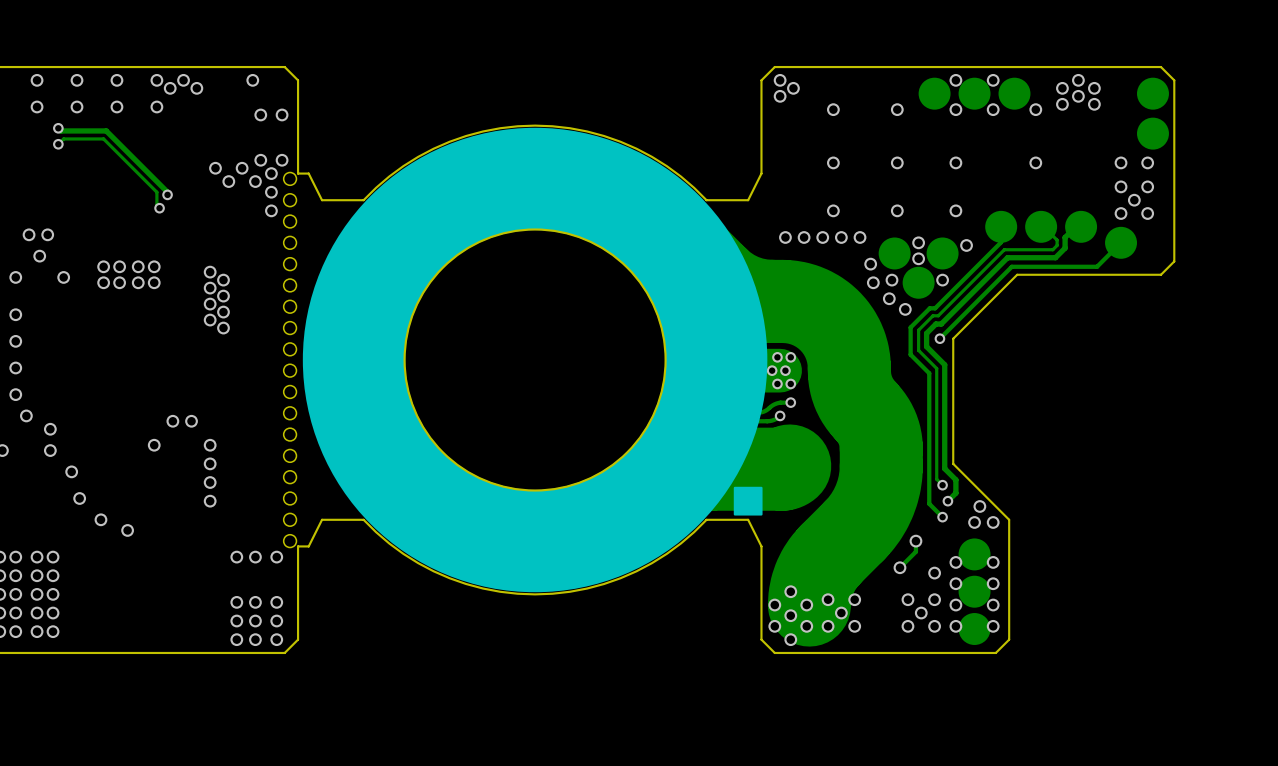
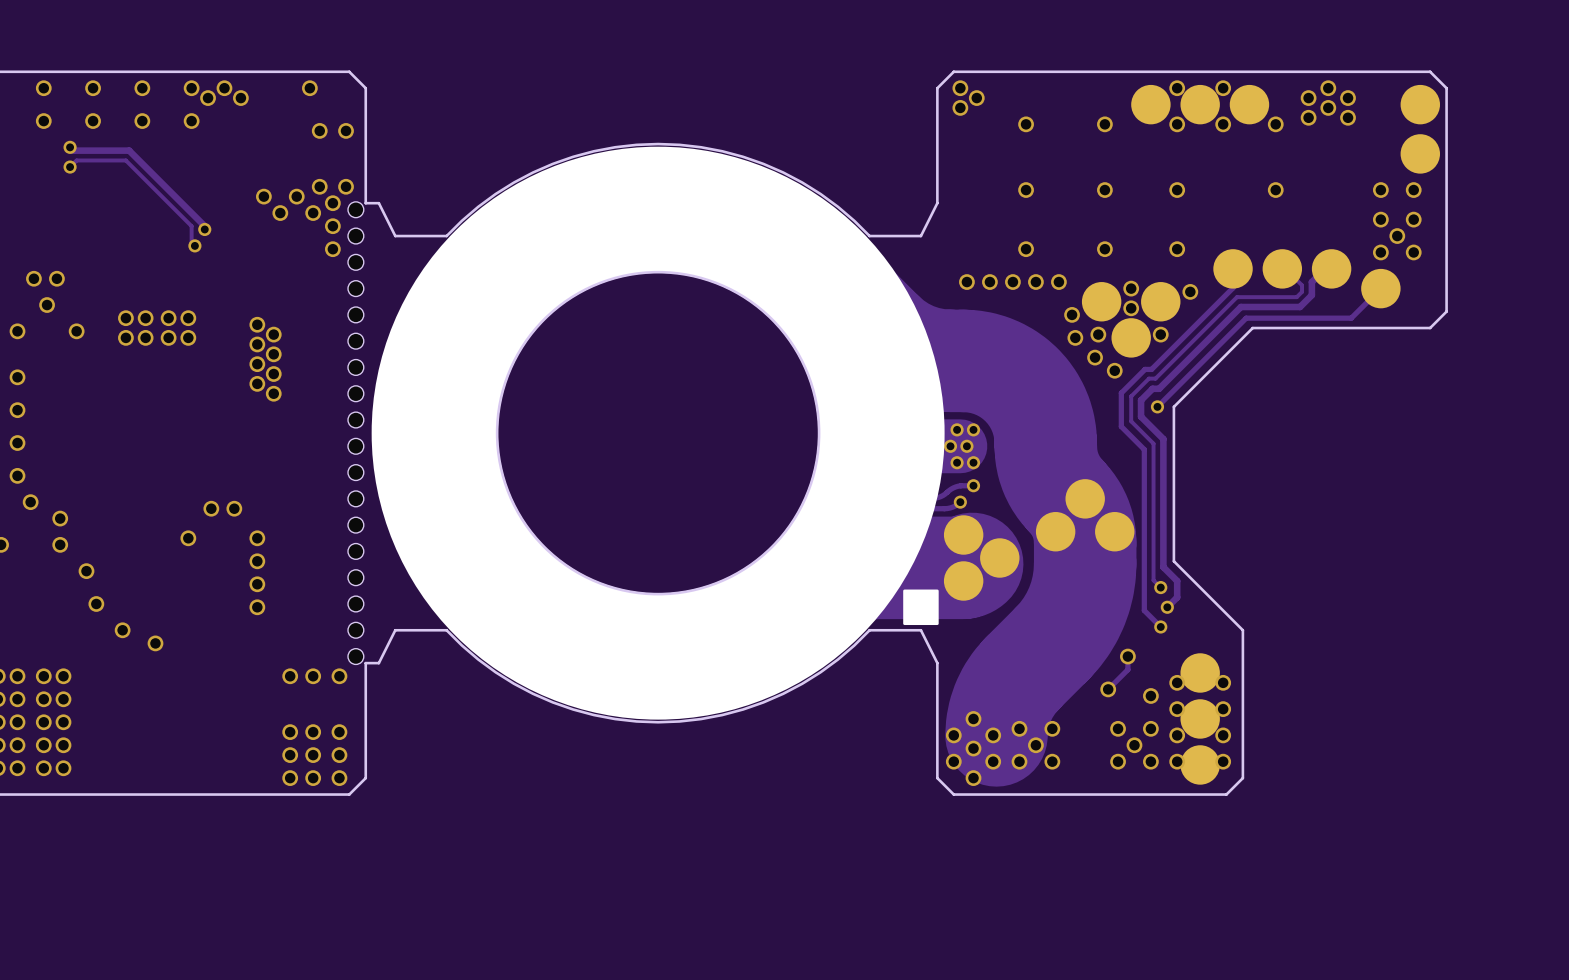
via: (979, 506) -> none
via: (974, 522) -> none
via: (993, 522) -> none

